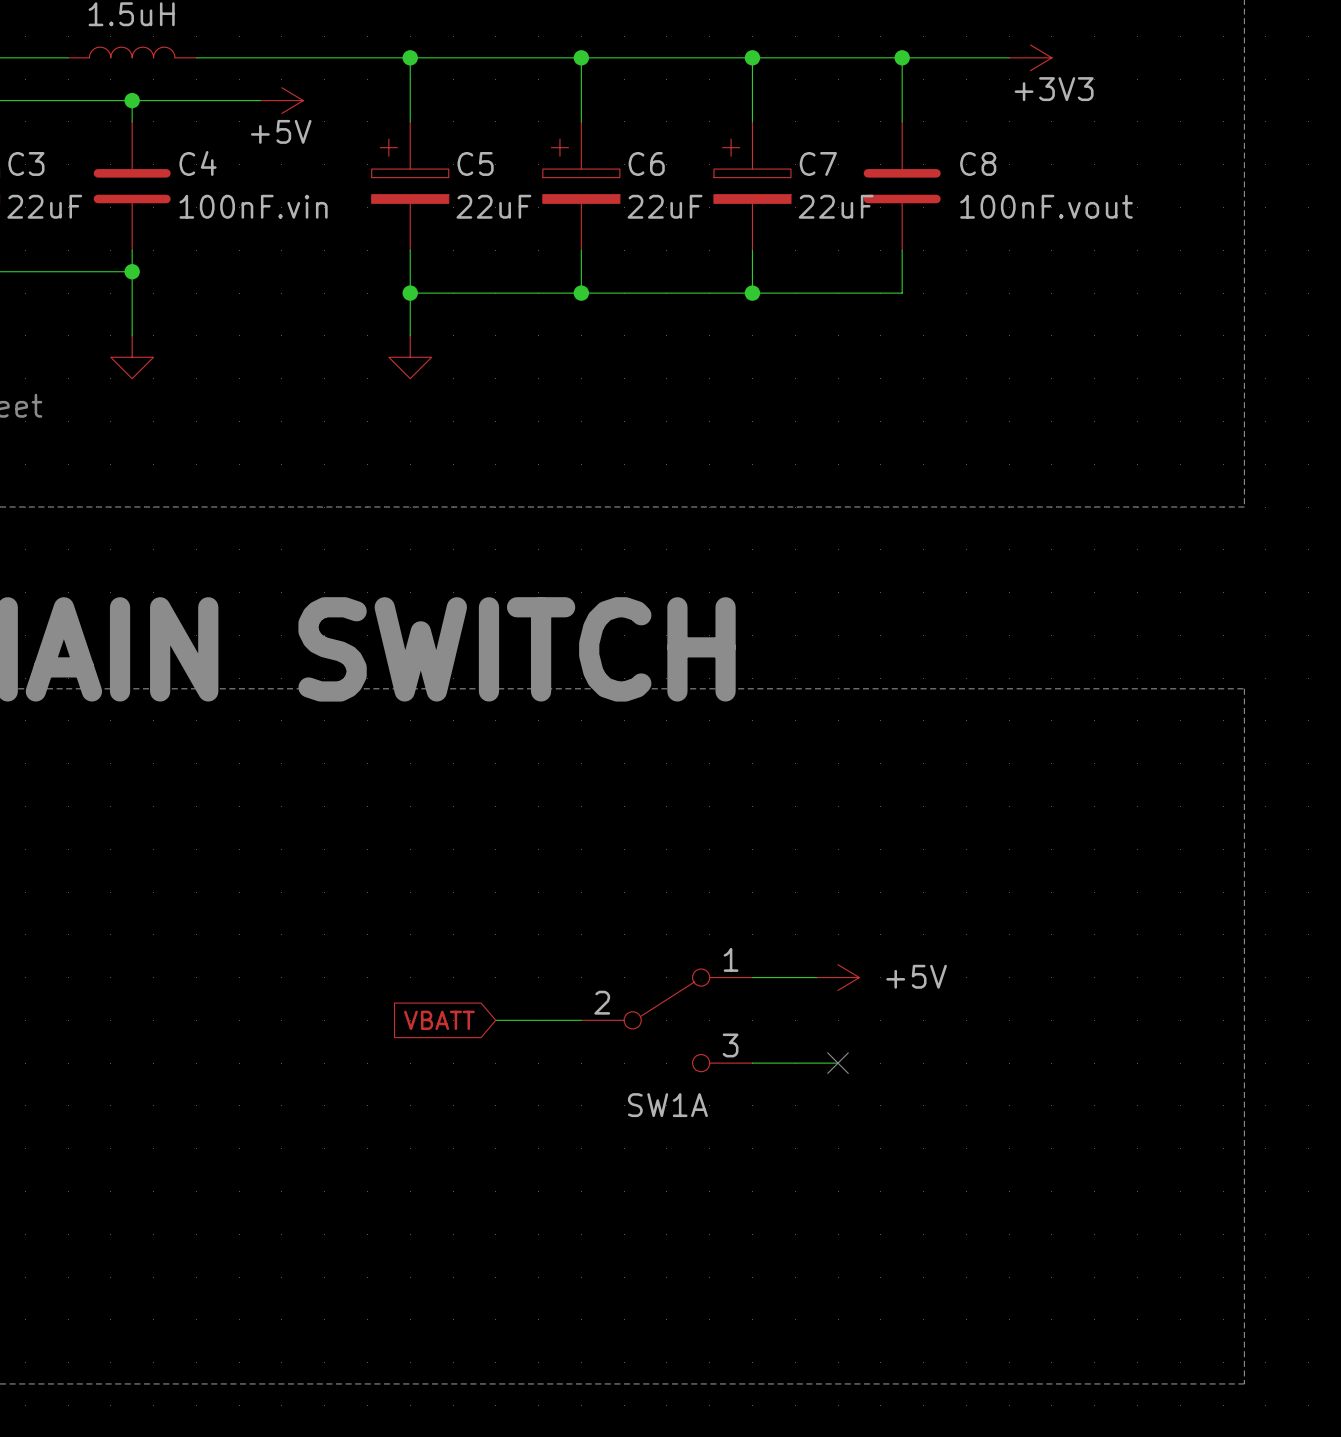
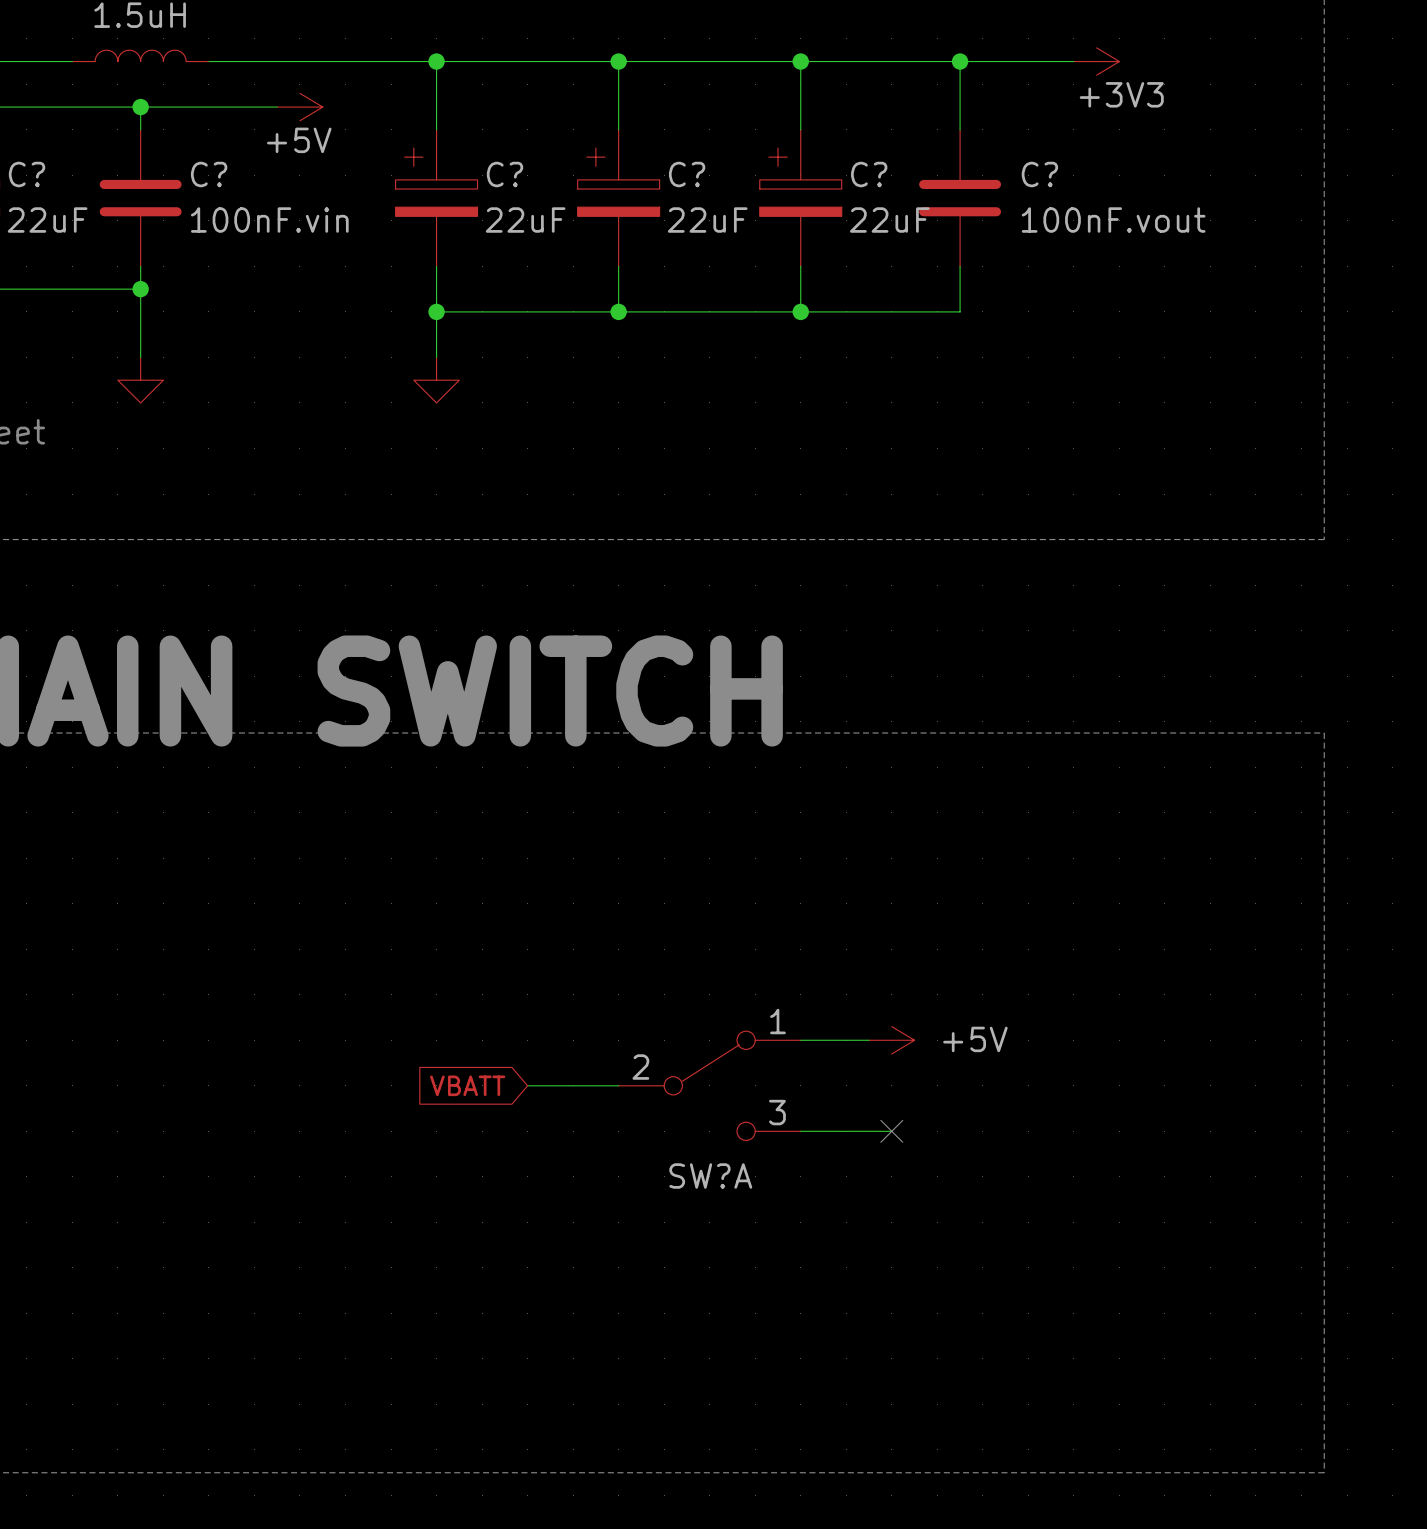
C3 name: C3 (26, 163) -> C? (27, 174)
C4 name: C4 (198, 163) -> C? (209, 174)
C5 name: C5 (475, 163) -> C? (505, 174)
C6 name: C6 (646, 163) -> C? (687, 174)
C7 name: C7 (818, 163) -> C? (869, 174)
C8 name: C8 (978, 163) -> C? (1039, 174)
SW1A name: SW1A (667, 1105) -> SW?A (710, 1176)

